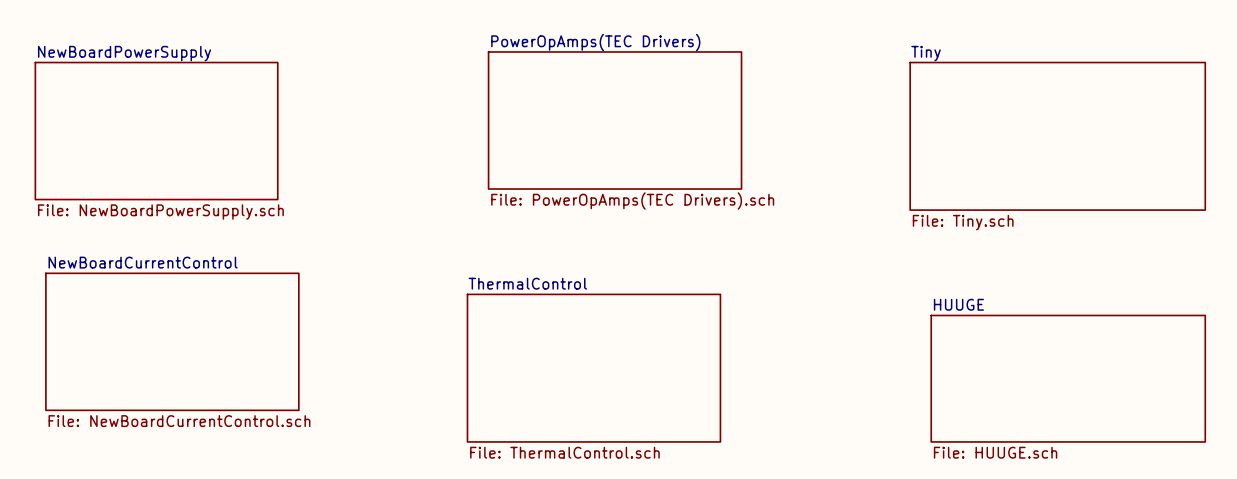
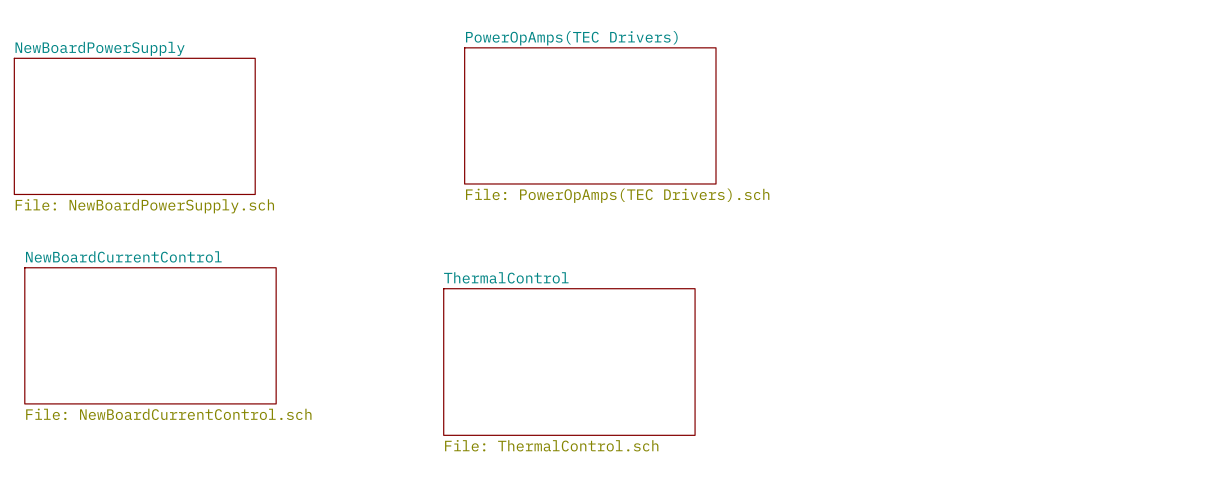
sheet Tiny: File: Tiny.sch (1057, 136) -> none
sheet HUUGE: File: HUUGE.sch (1068, 378) -> none

